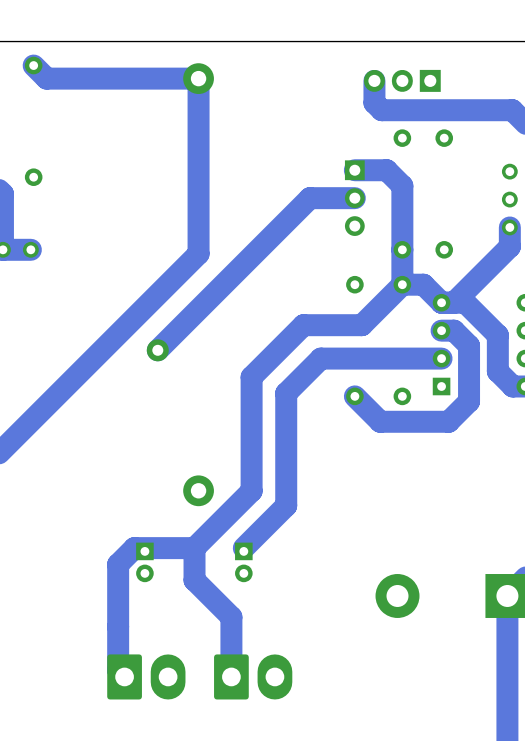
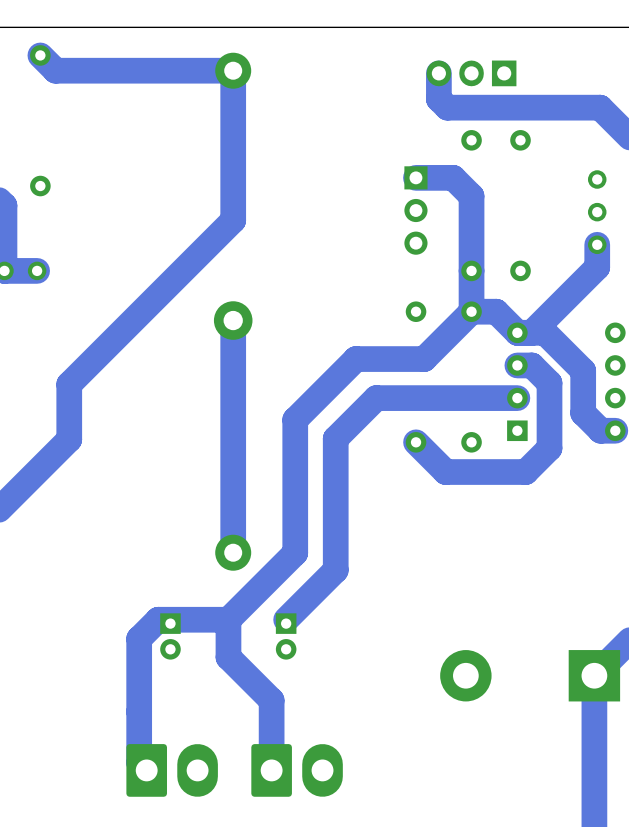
track: (354, 198) (309, 198) (157, 350) -> none
track: (198, 206) (198, 253) (58, 393) -> (233, 220) (69, 384) (69, 439)
track: none -> (233, 320) (233, 552)
via: none -> (233, 320)
via: (157, 350) -> none

